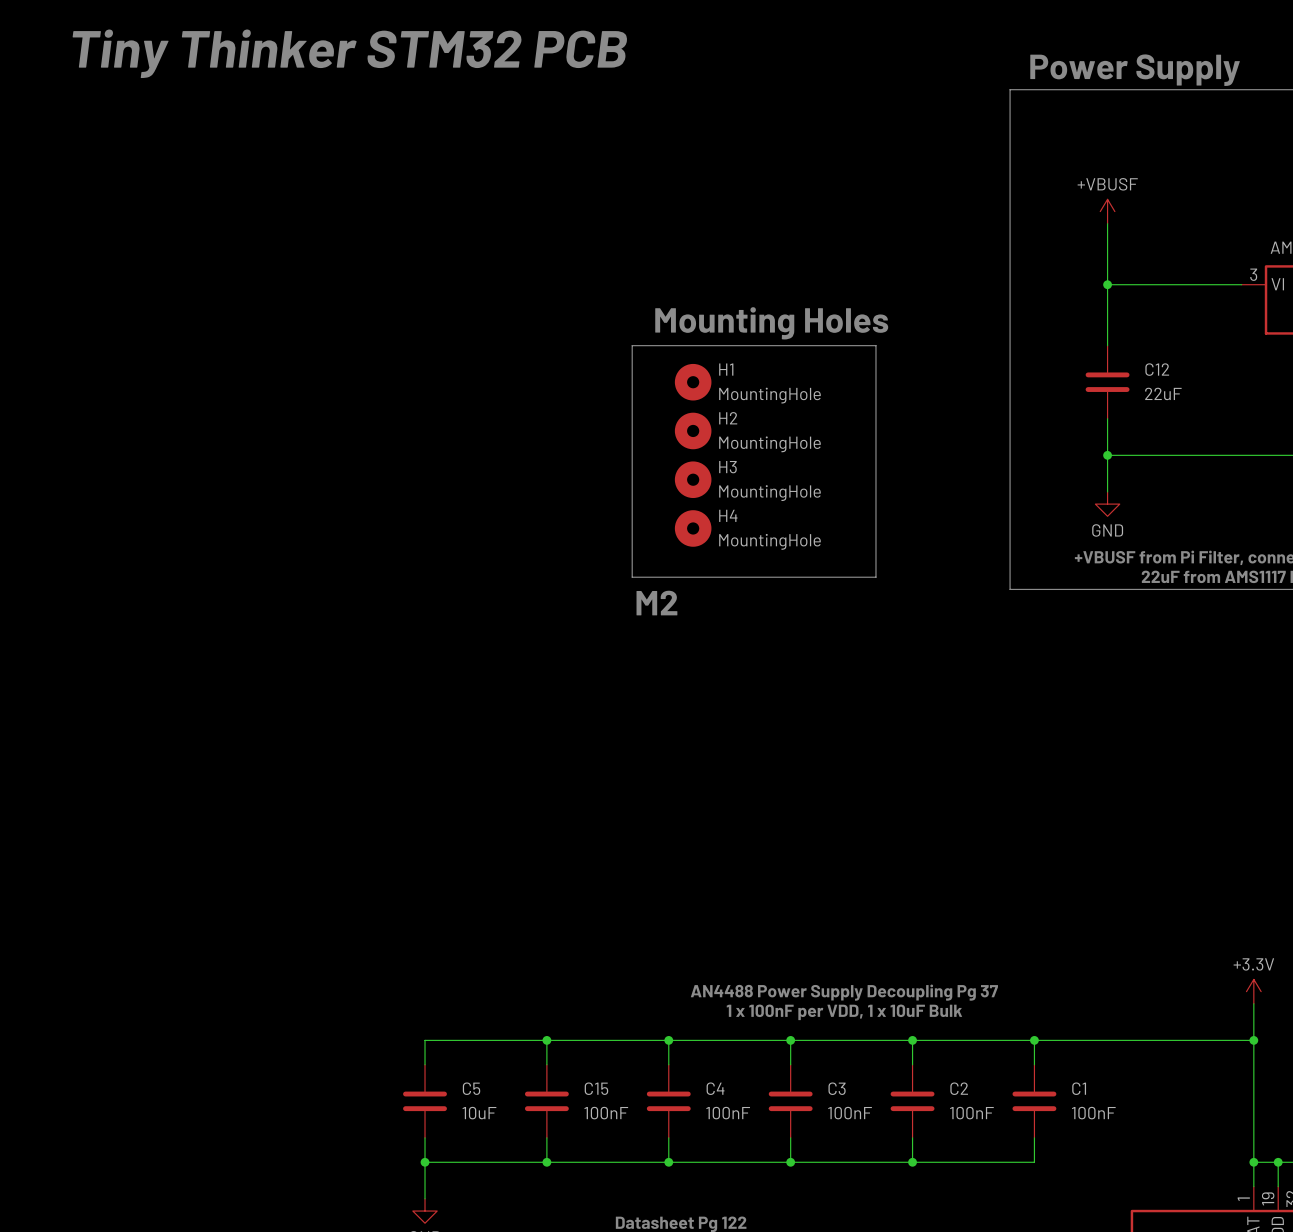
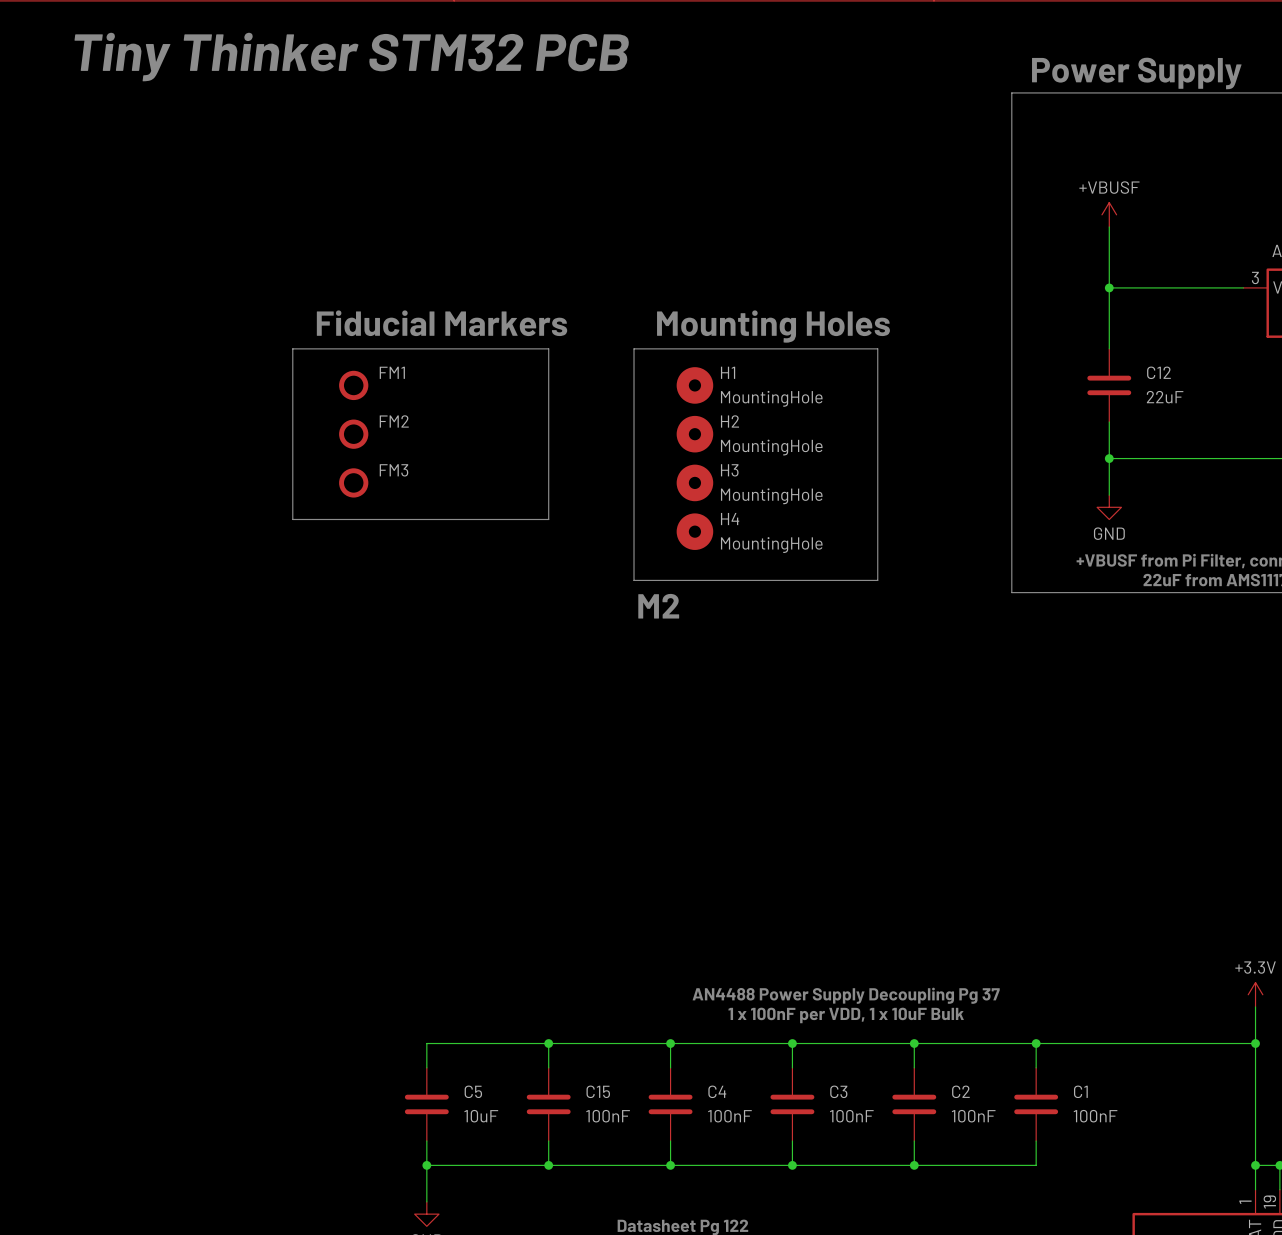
text: none -> Fiducial Markers (442, 323)
line: none -> (292, 348) (548, 348) (548, 519) (292, 519) (292, 348)
FM1: none -> (353, 385)
FM2: none -> (353, 434)
FM3: none -> (353, 482)

